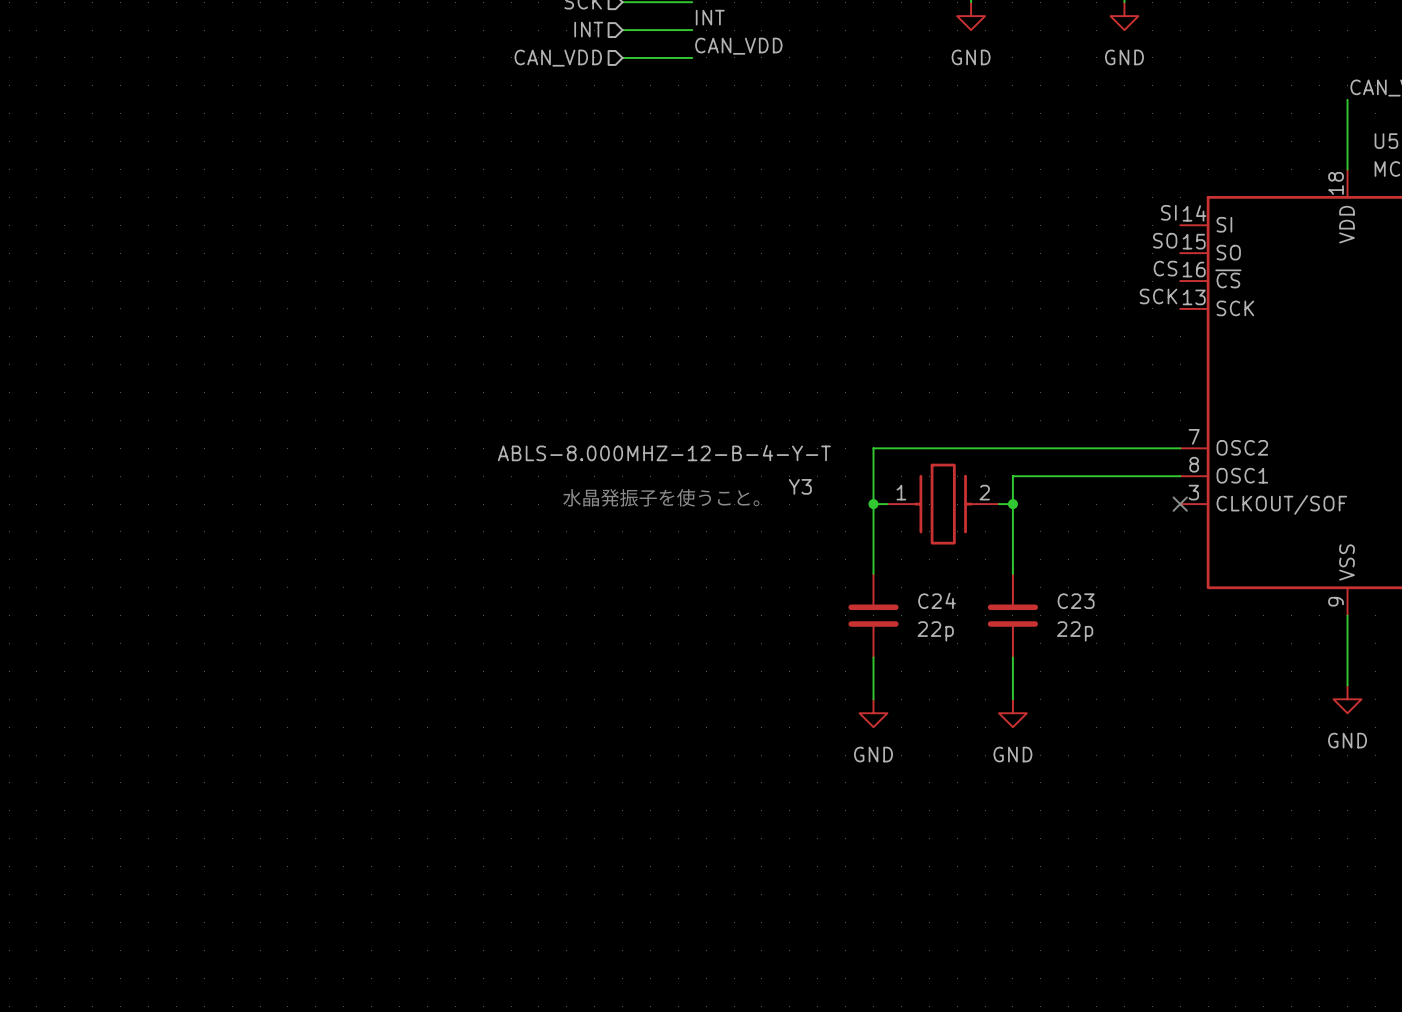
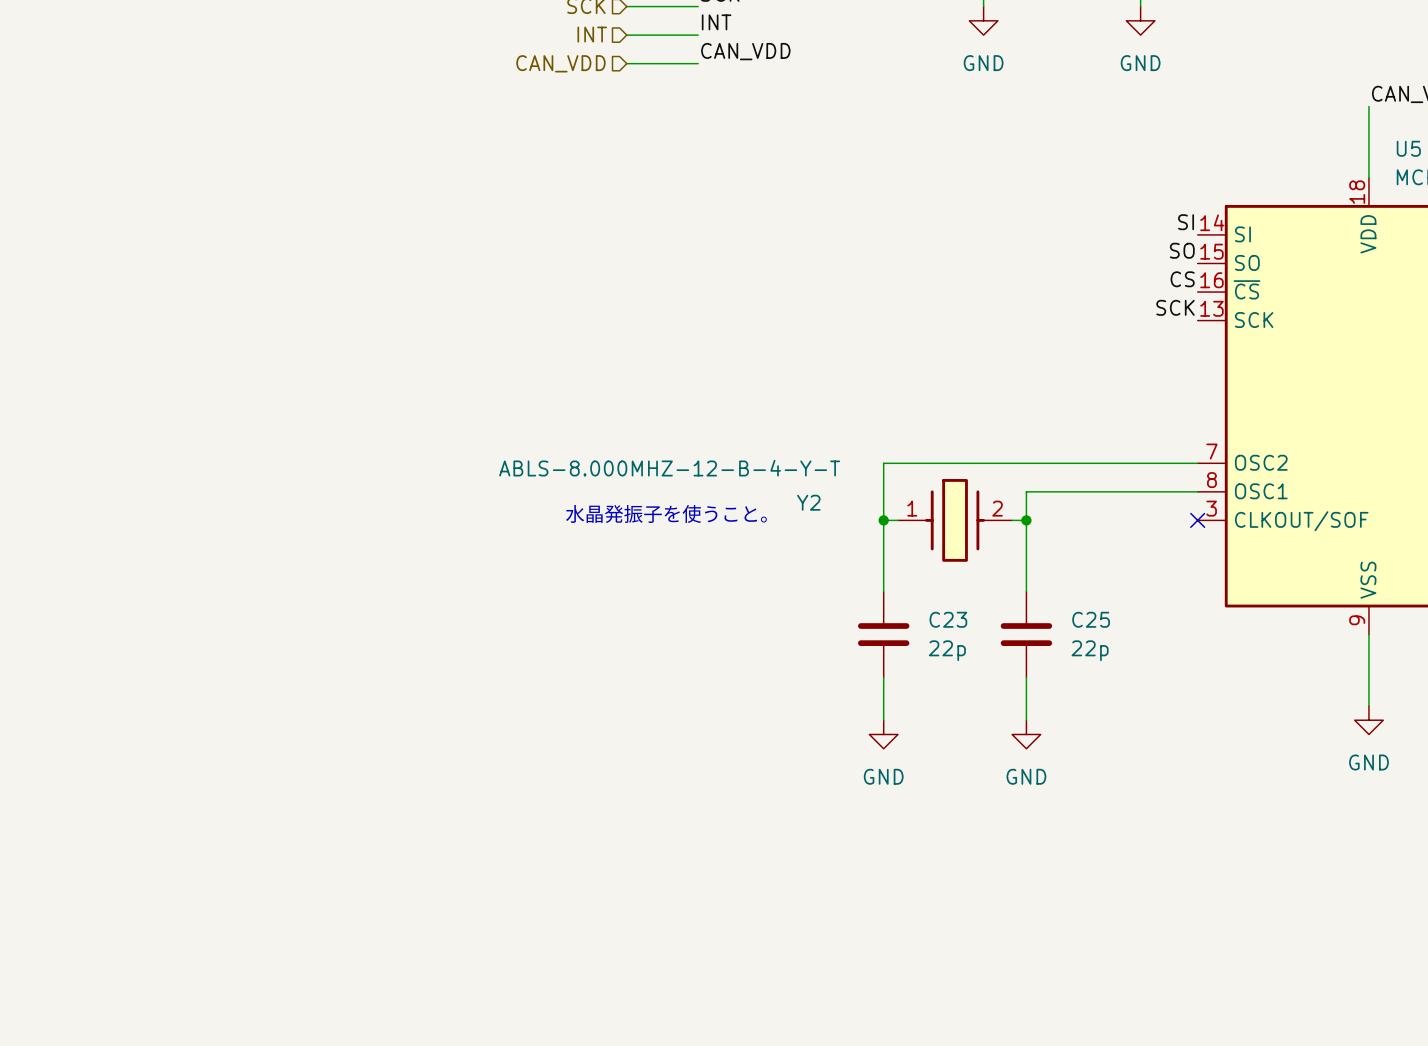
Y3 name: Y3 (800, 486) -> Y2 (808, 502)
C24 name: C24 (937, 600) -> C23 (948, 619)
C23 name: C23 (1076, 601) -> C25 (1091, 619)

